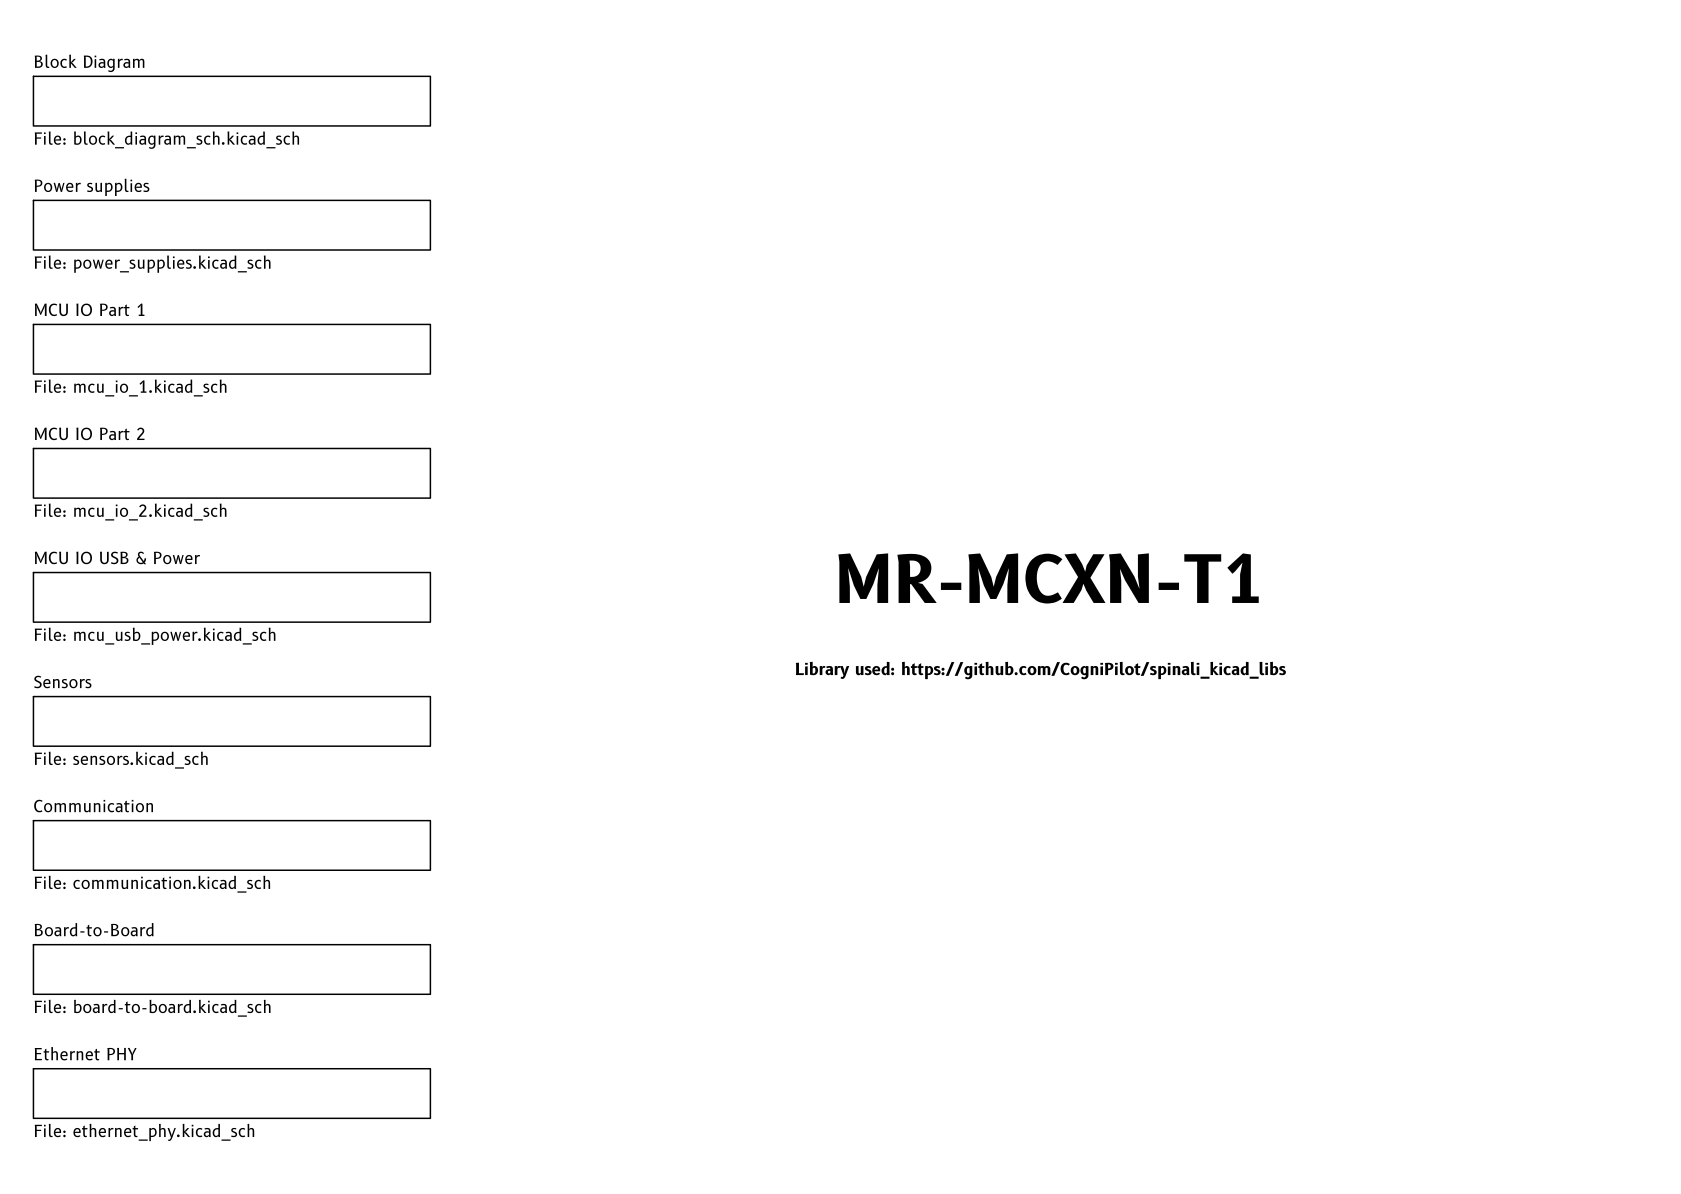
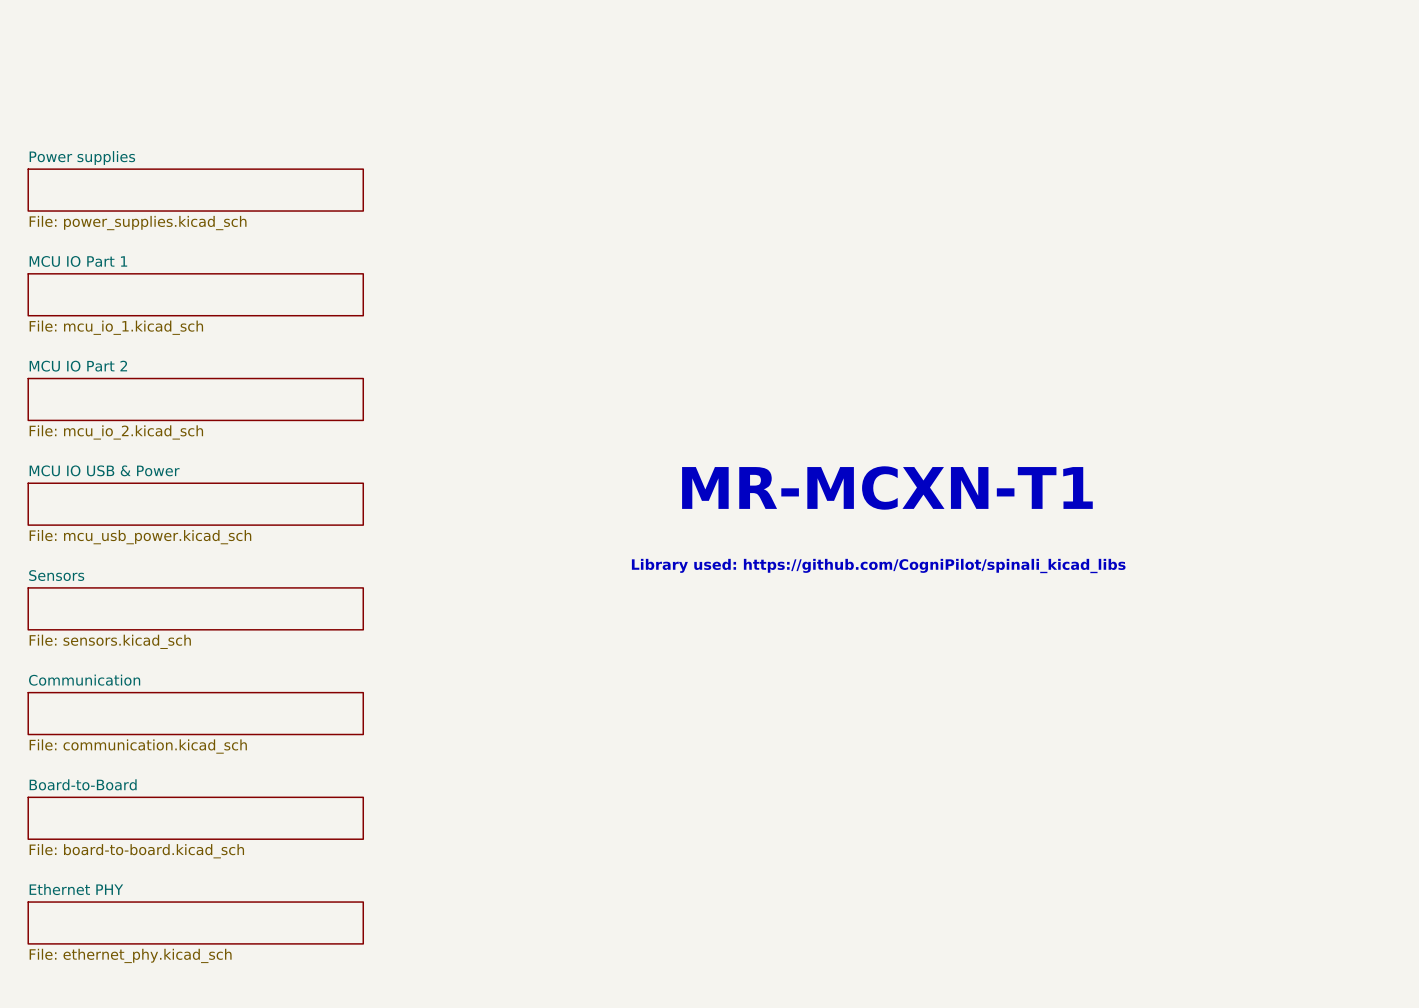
sheet Block Diagram: File: block_diagram_sch.kicad_sch (231, 101) -> none

